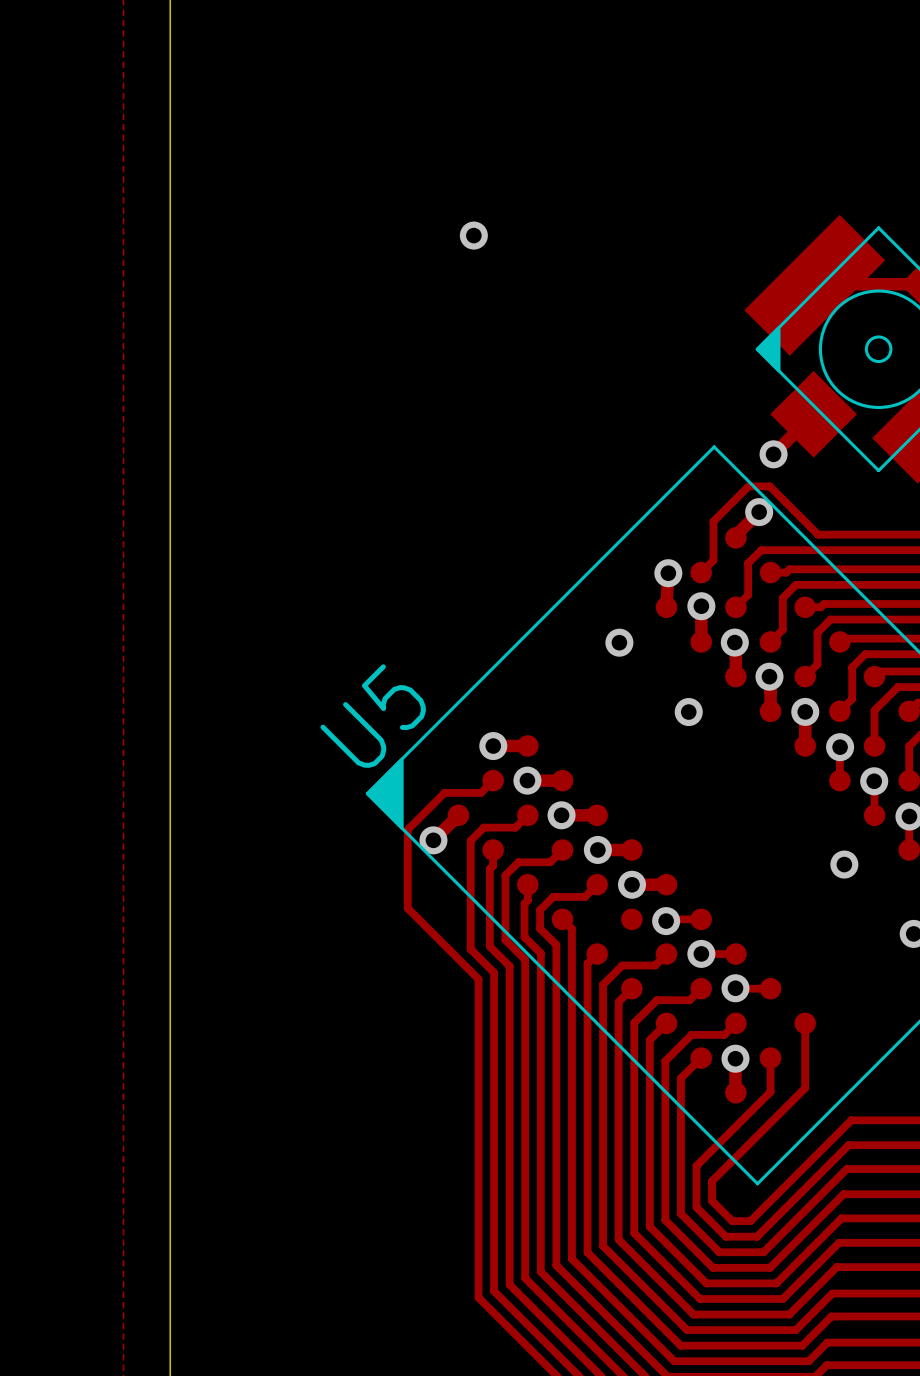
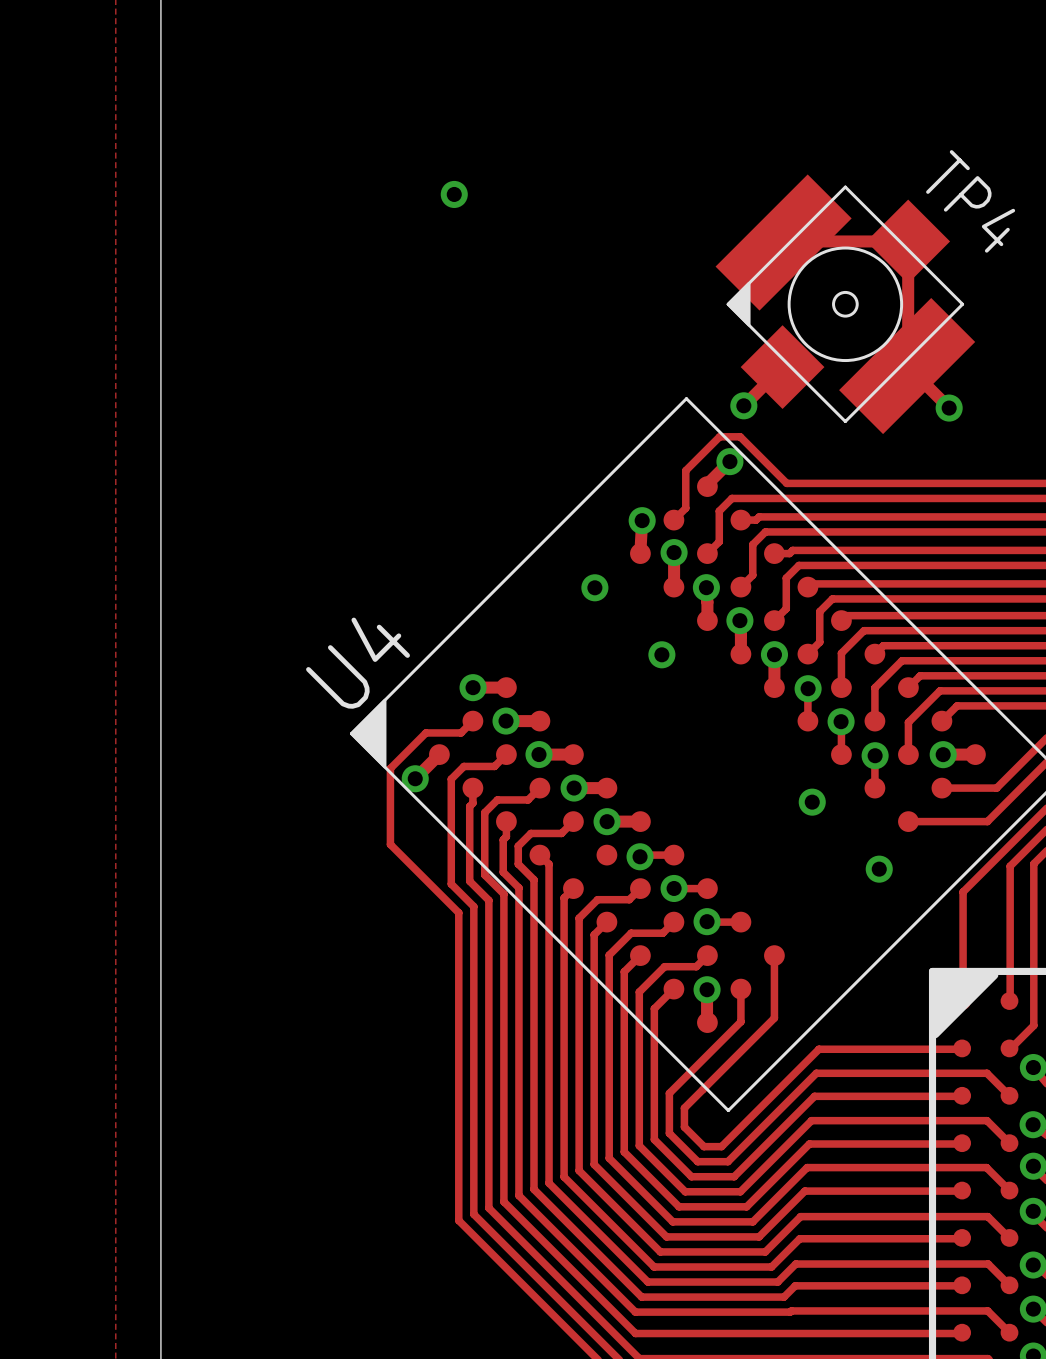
U5 name: U5 (373, 716) -> U4 (358, 663)

